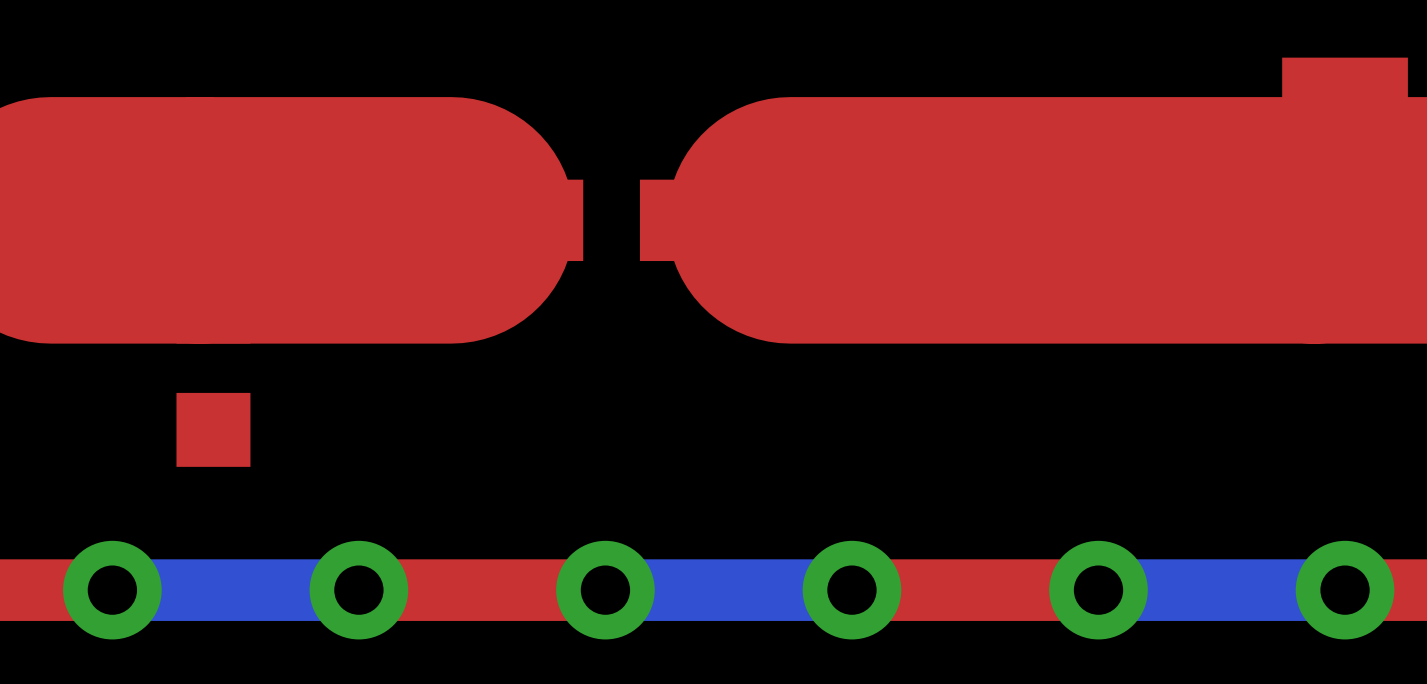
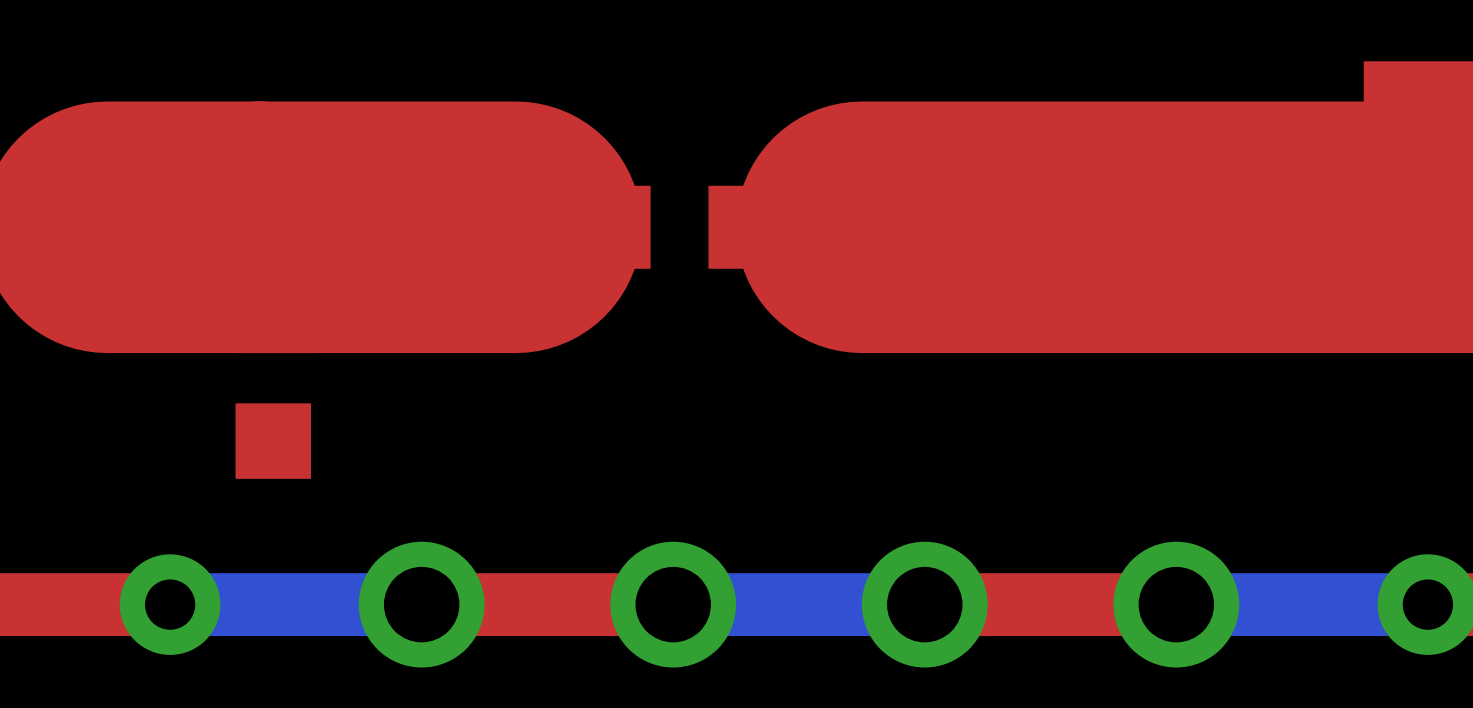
via size: [309, 540, 409, 640] -> [358, 541, 485, 668]
via size: [556, 540, 655, 640] -> [610, 541, 737, 668]
via size: [802, 540, 902, 640] -> [861, 541, 988, 668]
via size: [1049, 540, 1148, 640] -> [1113, 541, 1240, 668]

